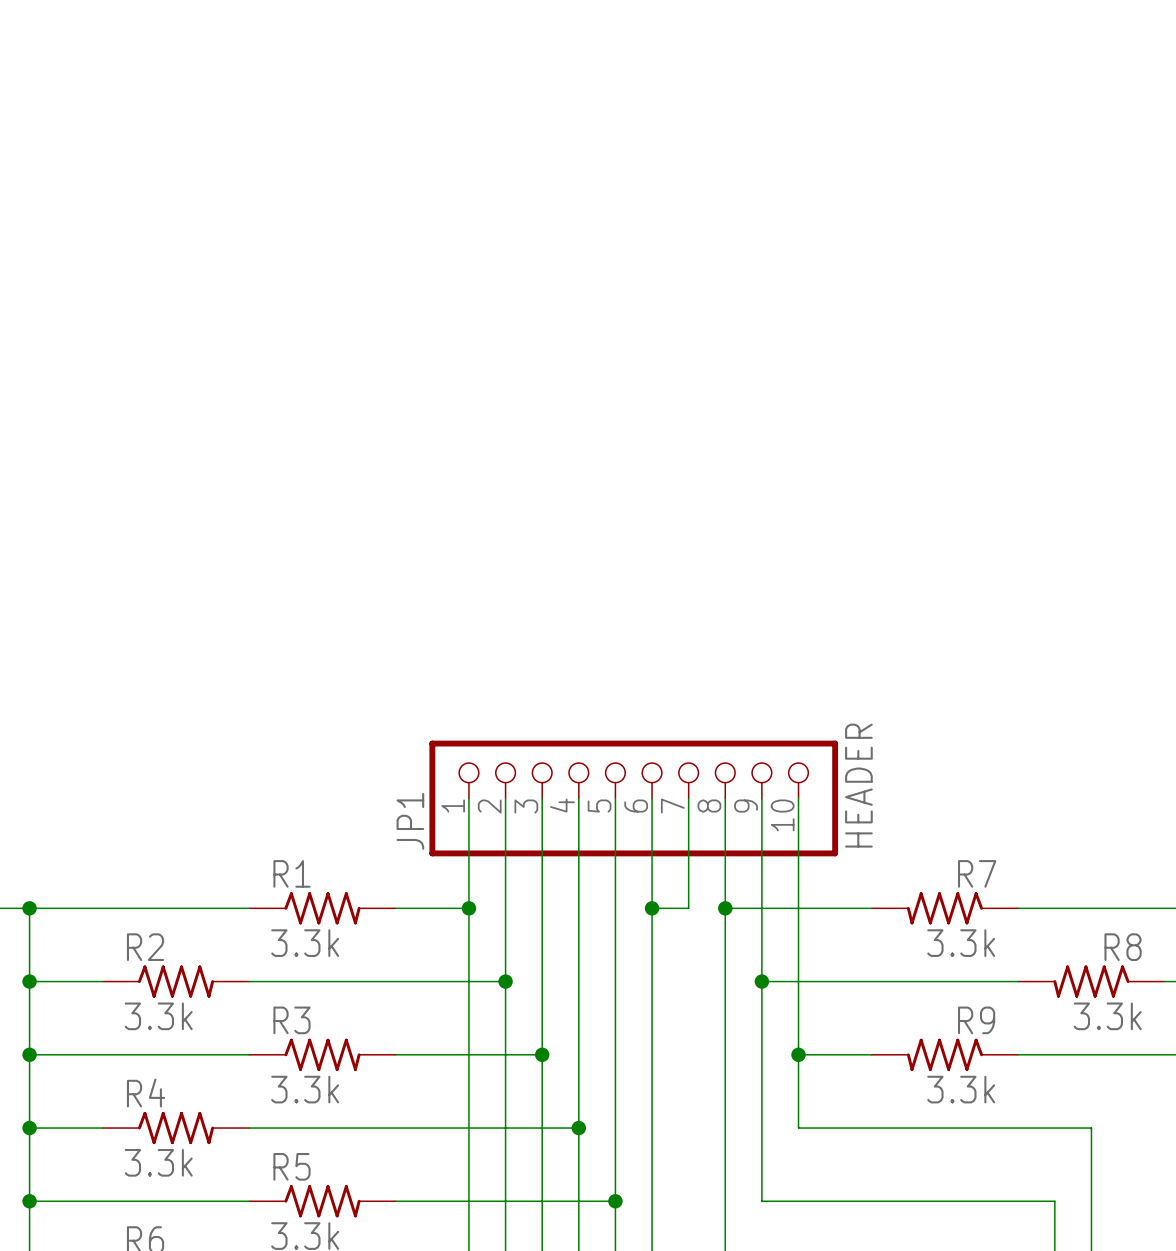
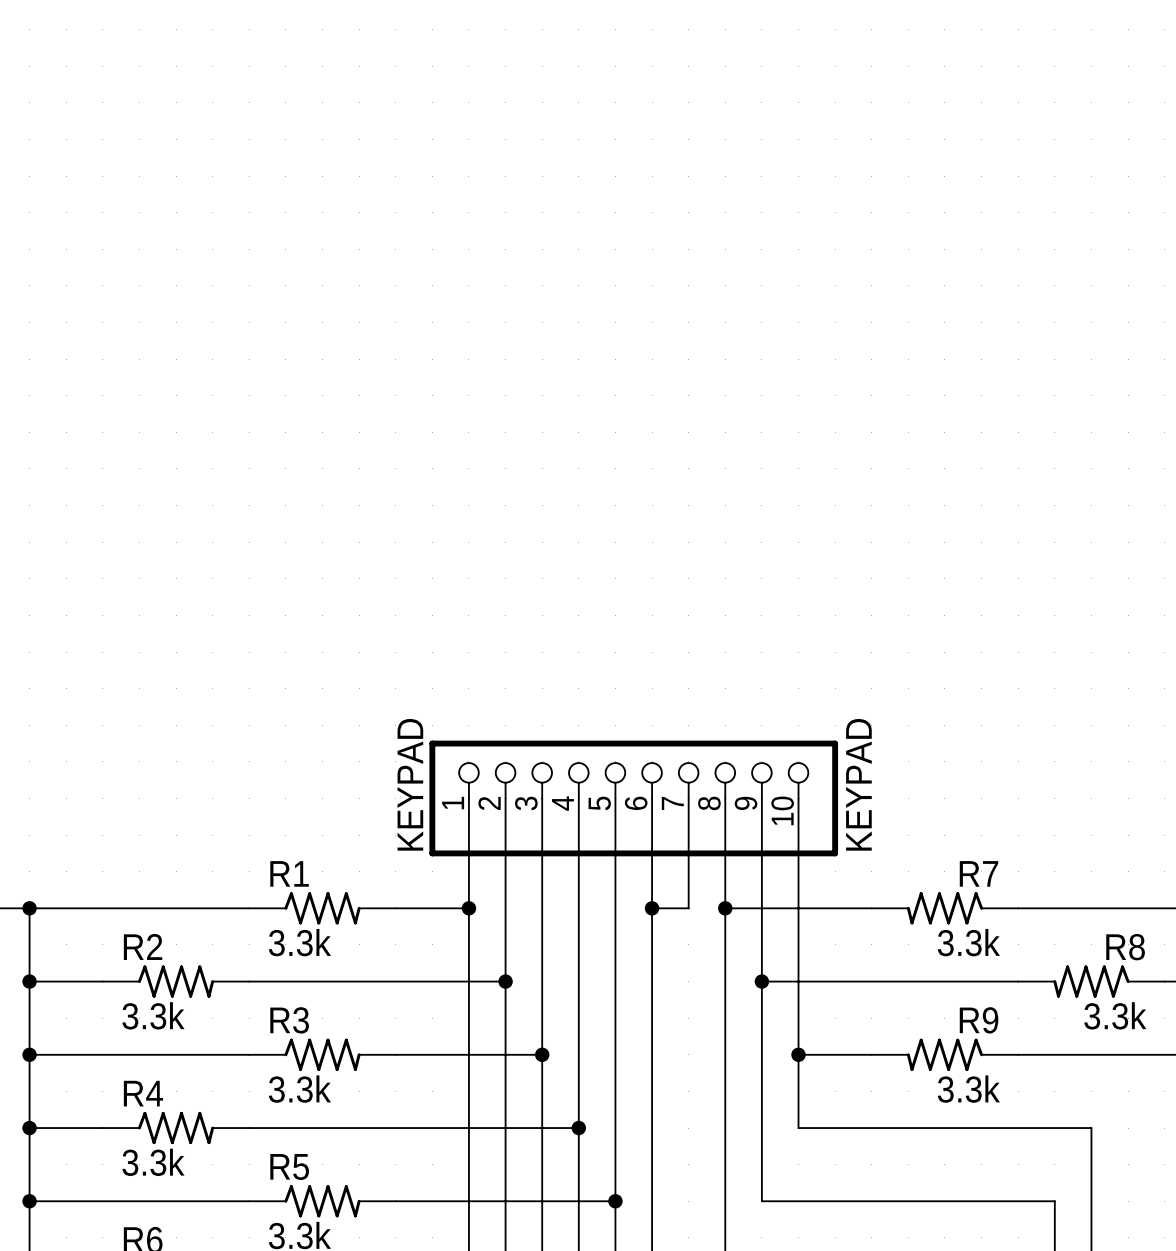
JP1 value: HEADER (858, 785) -> KEYPAD (858, 784)
JP1 name: JP1 (410, 821) -> KEYPAD (410, 784)

